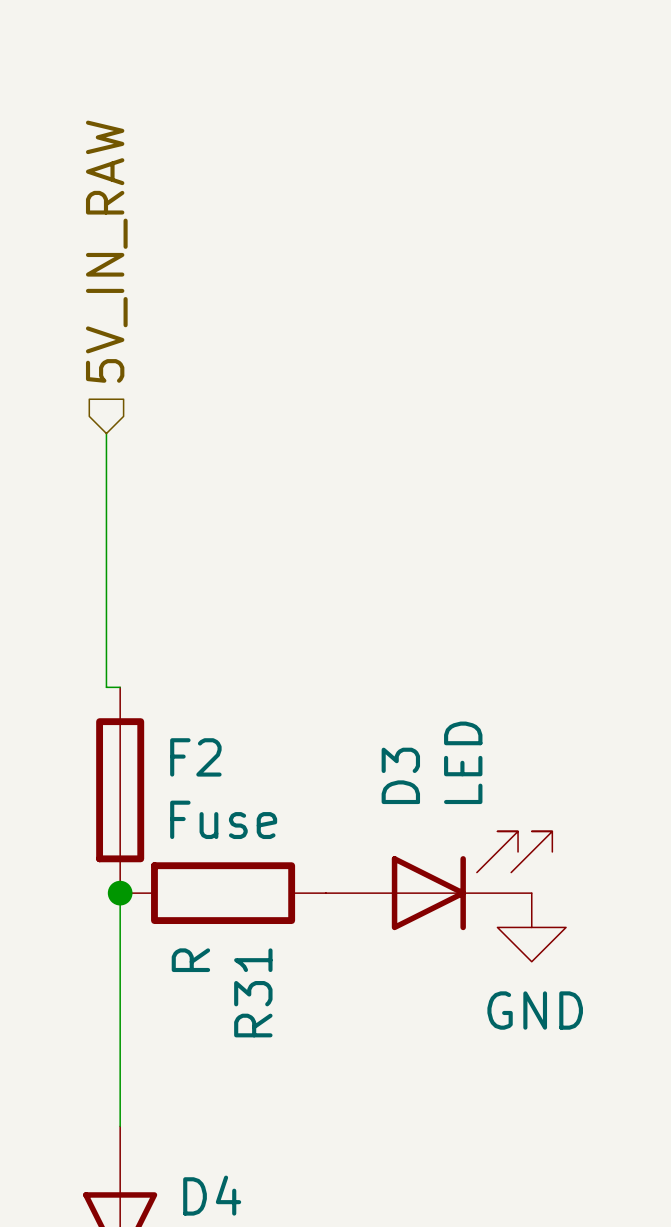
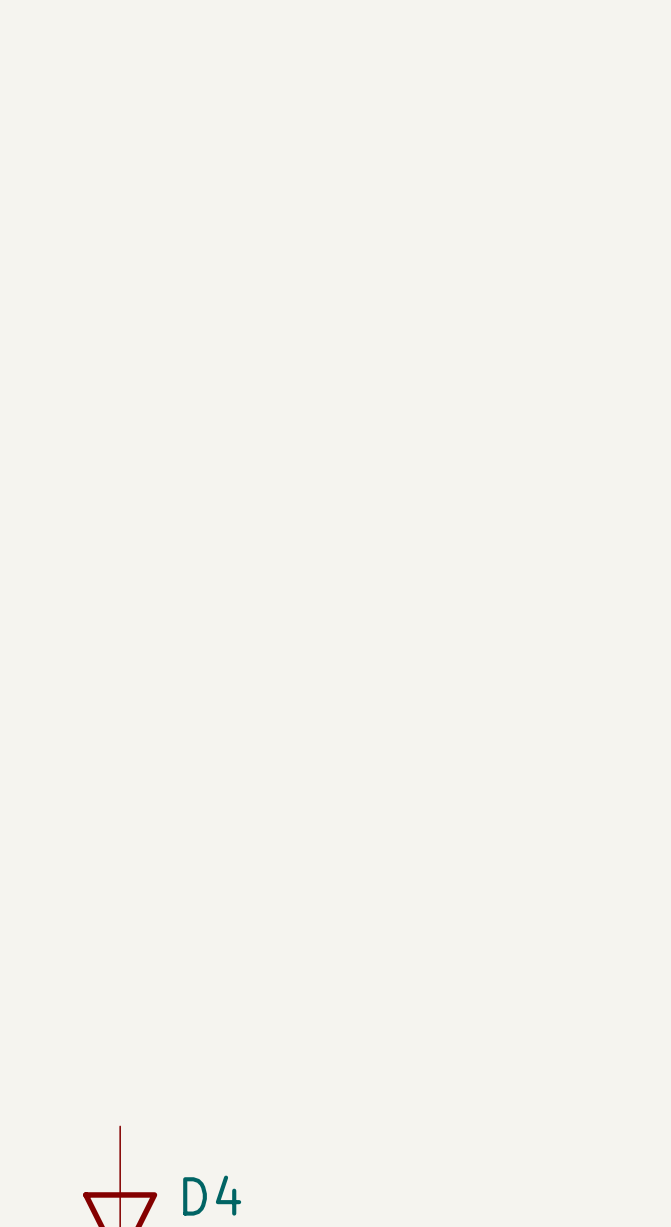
hierarchical label: 5V_IN_RAW (106, 251) -> none
wire: (106, 433) (106, 687) (120, 687) -> none
F2: Fuse (120, 790) -> none
D3: LED (439, 880) -> none
wire: (120, 893) (120, 1126) -> none
junction: (120, 893) -> none
R31: R (223, 893) -> none
power symbol: GND (531, 927) -> none

